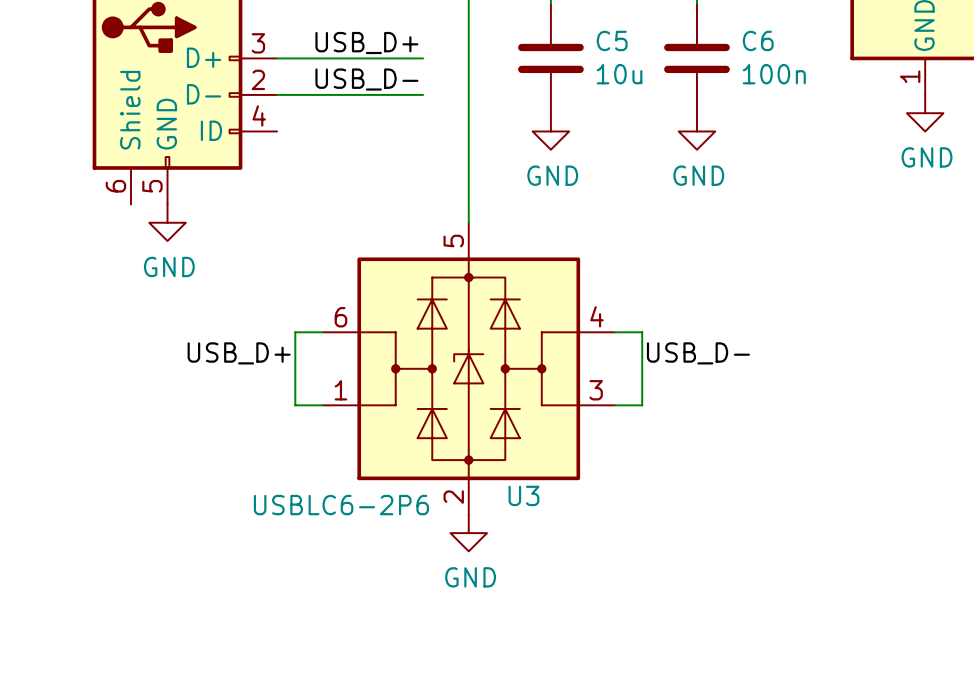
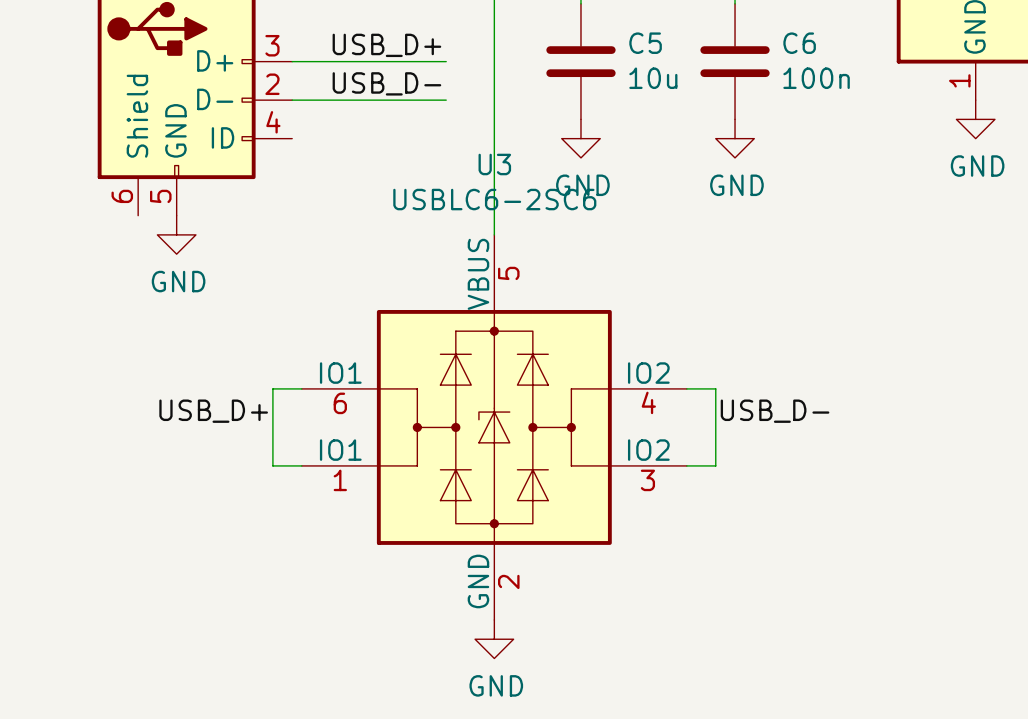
U3 symbol: [322, 222, 615, 515] -> [301, 234, 687, 620]
wire: (322, 332) (295, 332) (295, 405) (322, 405) -> (301, 388) (272, 388) (272, 465) (301, 465)
wire: (614, 332) (642, 332) (642, 405) (614, 405) -> (686, 388) (715, 388) (715, 465) (686, 465)
label position: USB_D+ (239, 353) -> USB_D+ (213, 411)
label position: USB_D- (698, 353) -> USB_D- (775, 411)
U3 name position: U3 (523, 495) -> U3 (494, 164)
U3 value: USBLC6-2P6 (341, 505) -> USBLC6-2SC6 (494, 199)
power symbol position: GND (468, 533) -> GND (494, 639)

